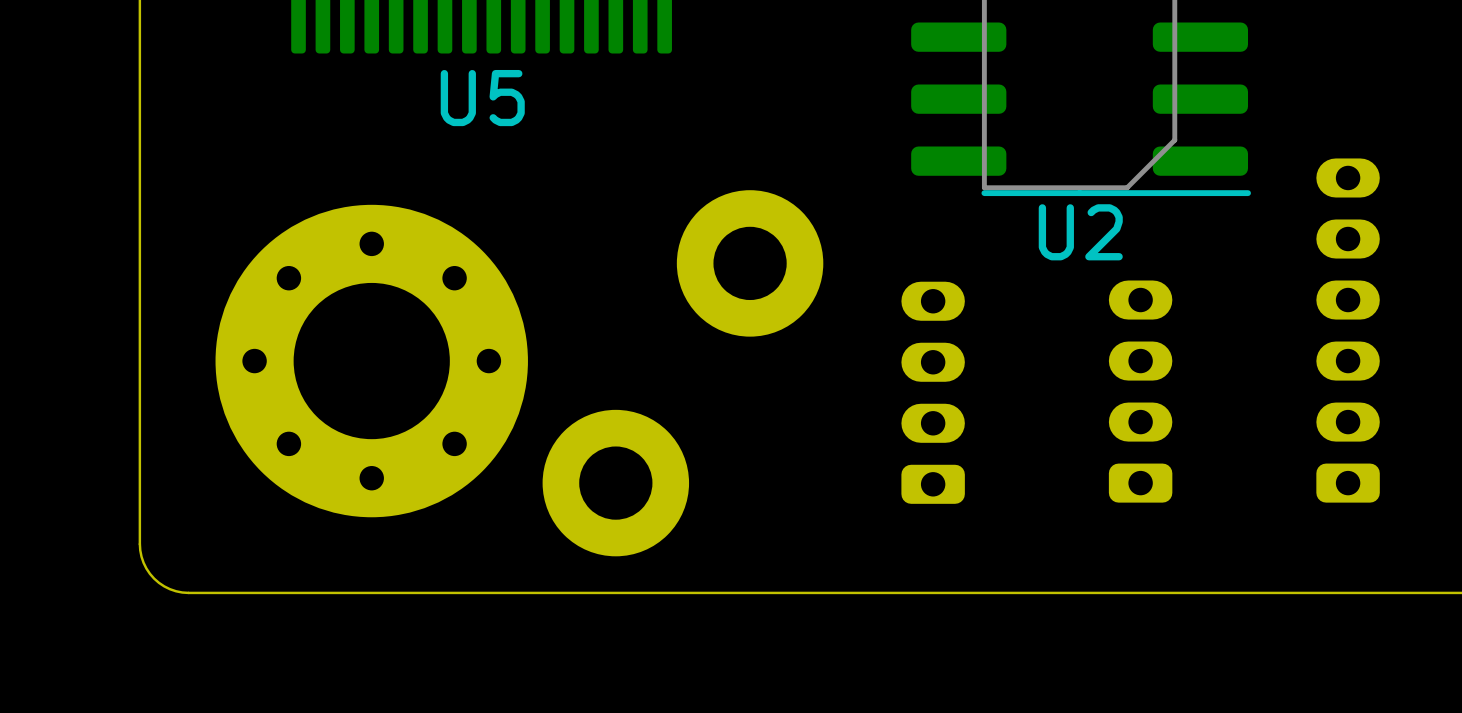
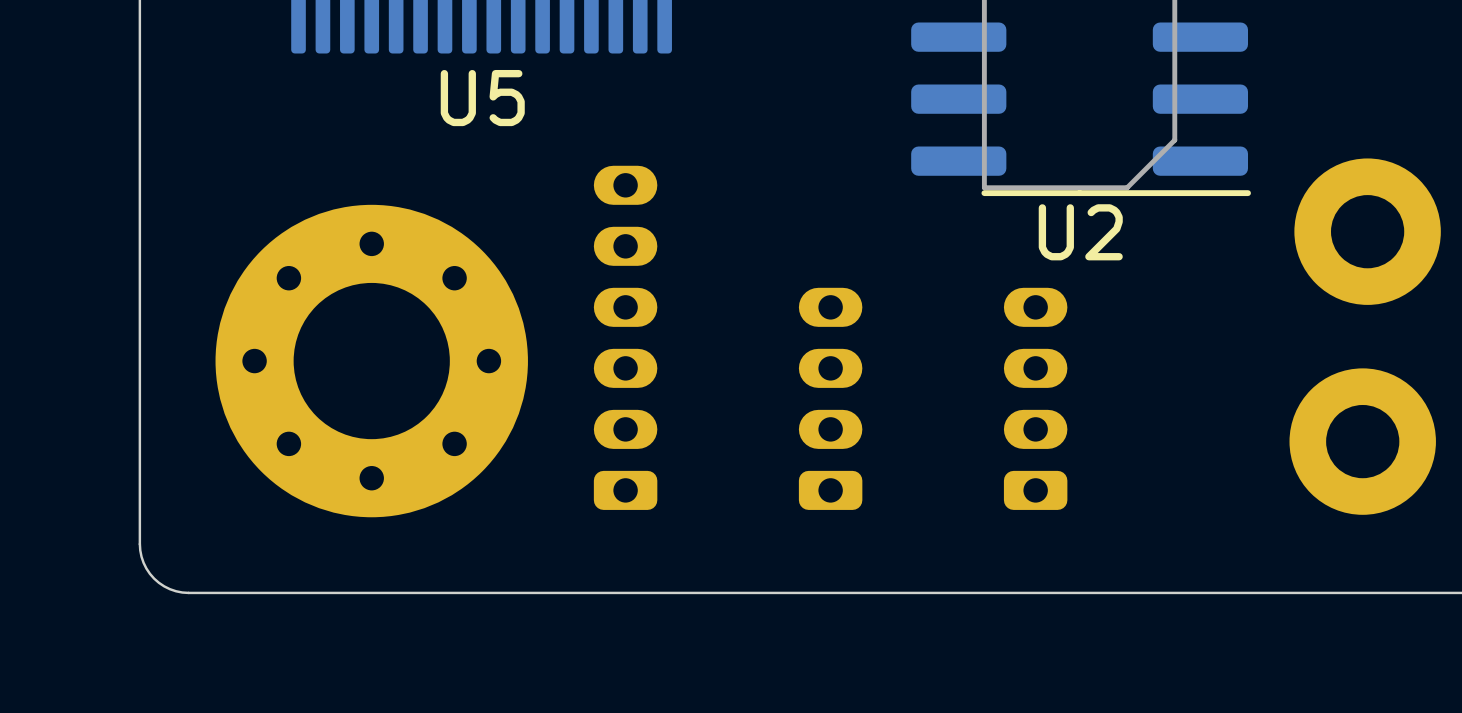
part: none -> (1367, 231)
part: (750, 263) -> none
part position: (1348, 330) -> (625, 337)
part: (1140, 391) -> none
part: (933, 392) -> none
part: none -> (830, 398)
part: none -> (1035, 398)
part: none -> (1362, 441)
part: (615, 483) -> none

